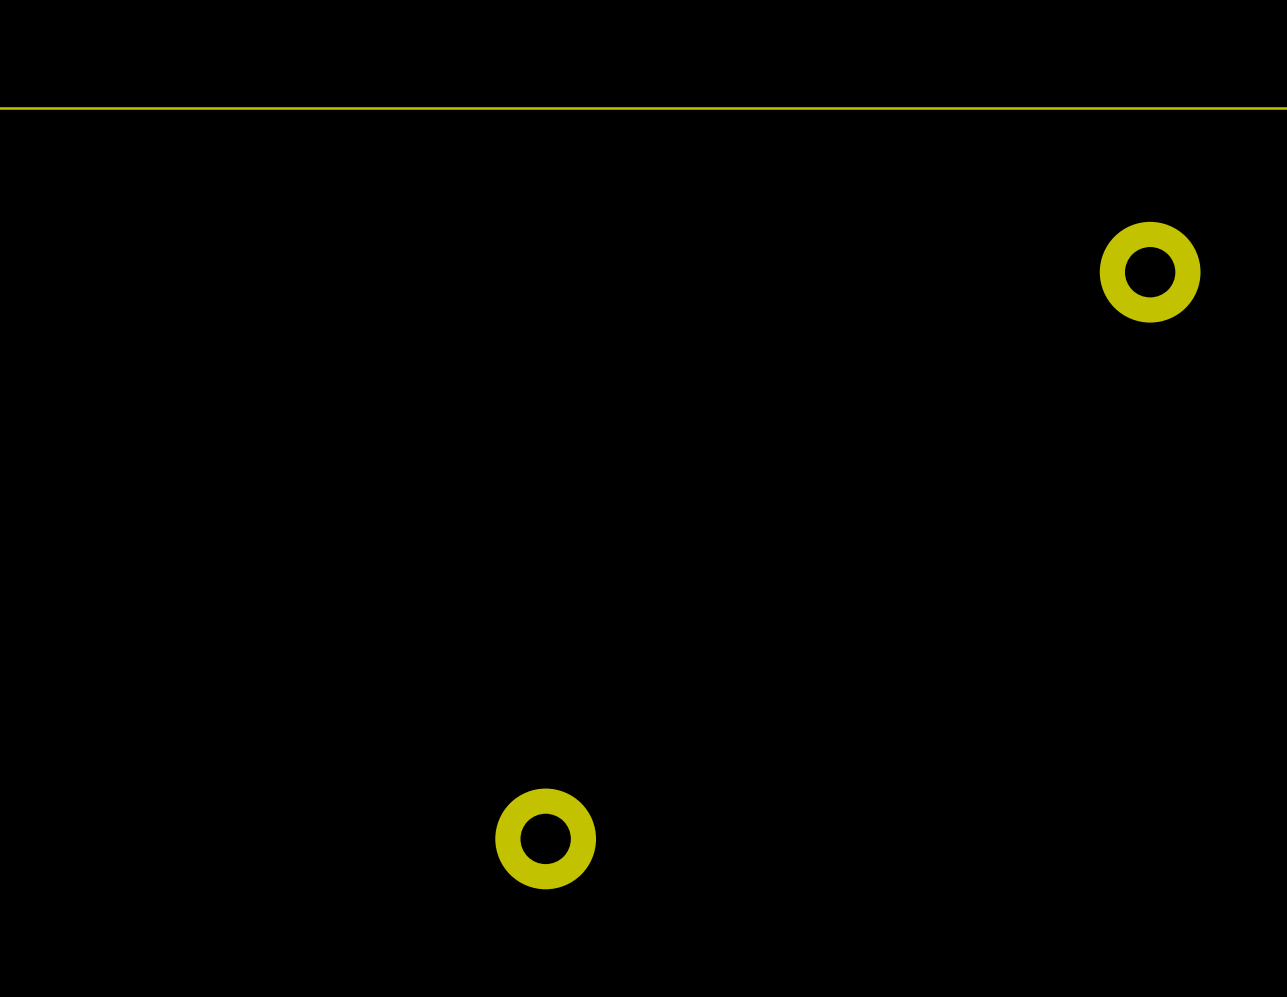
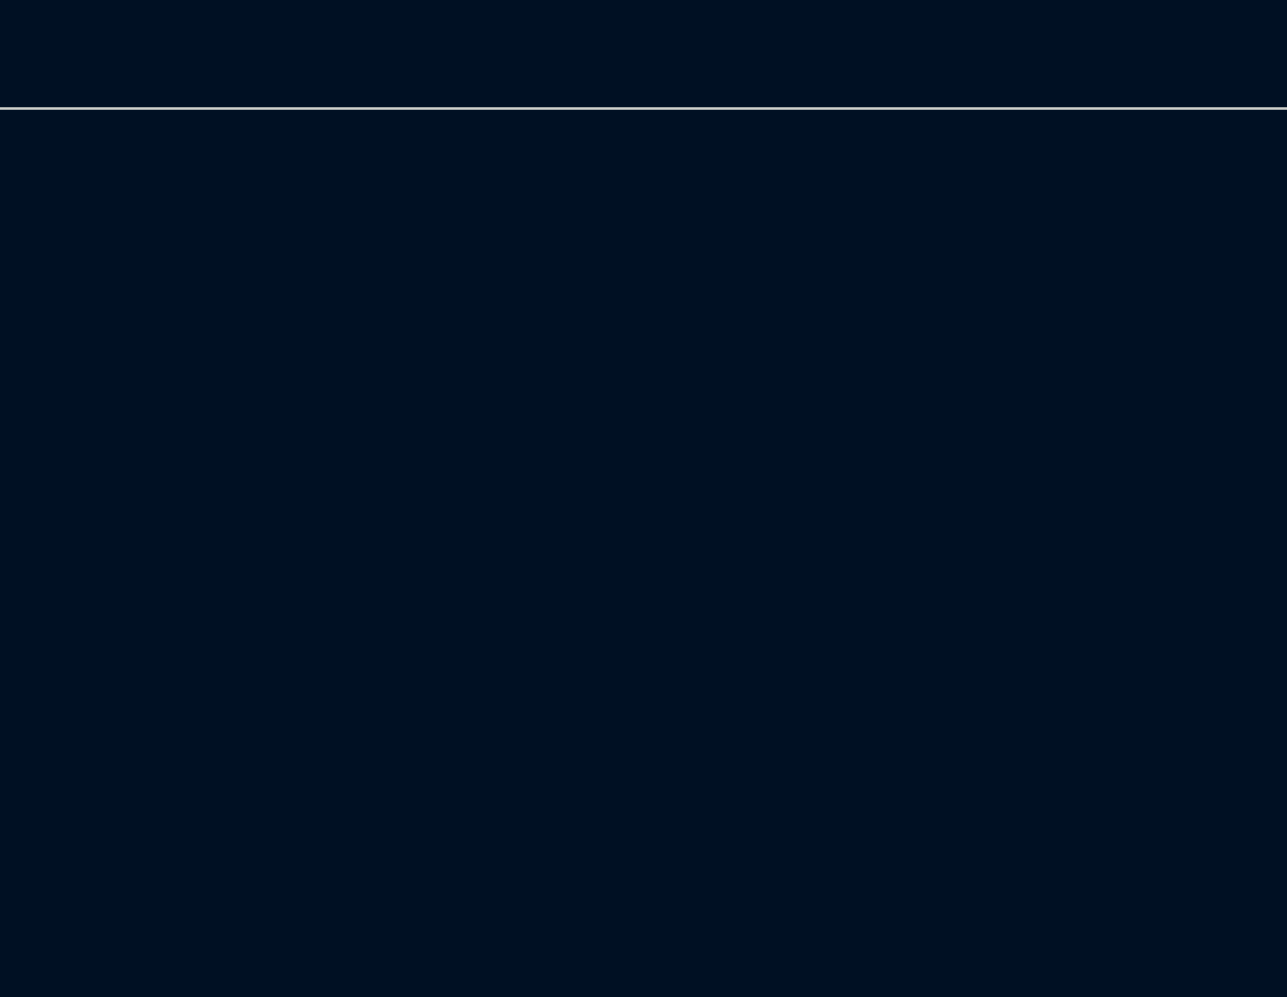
part: (1150, 272) -> none
part: (545, 838) -> none

